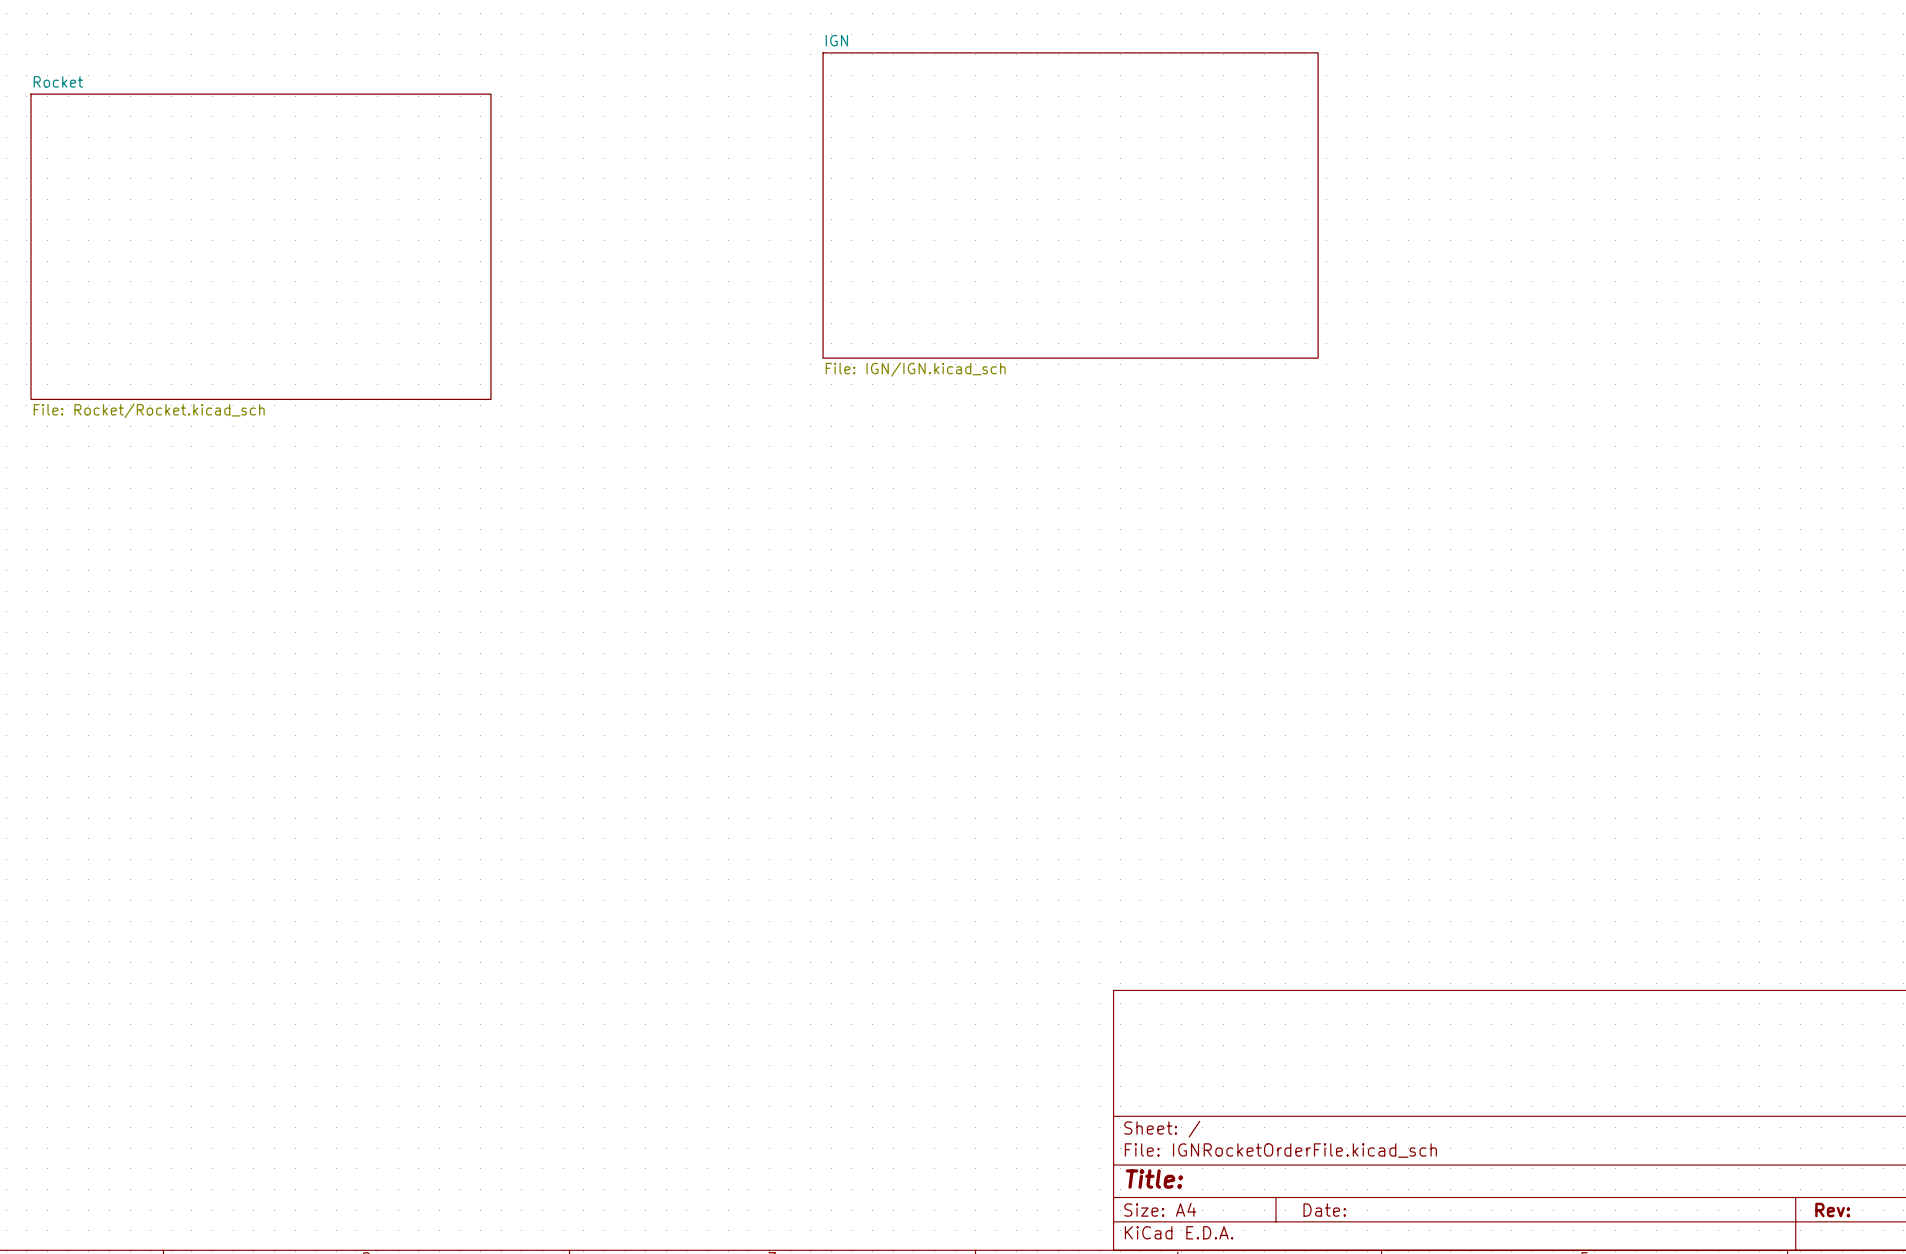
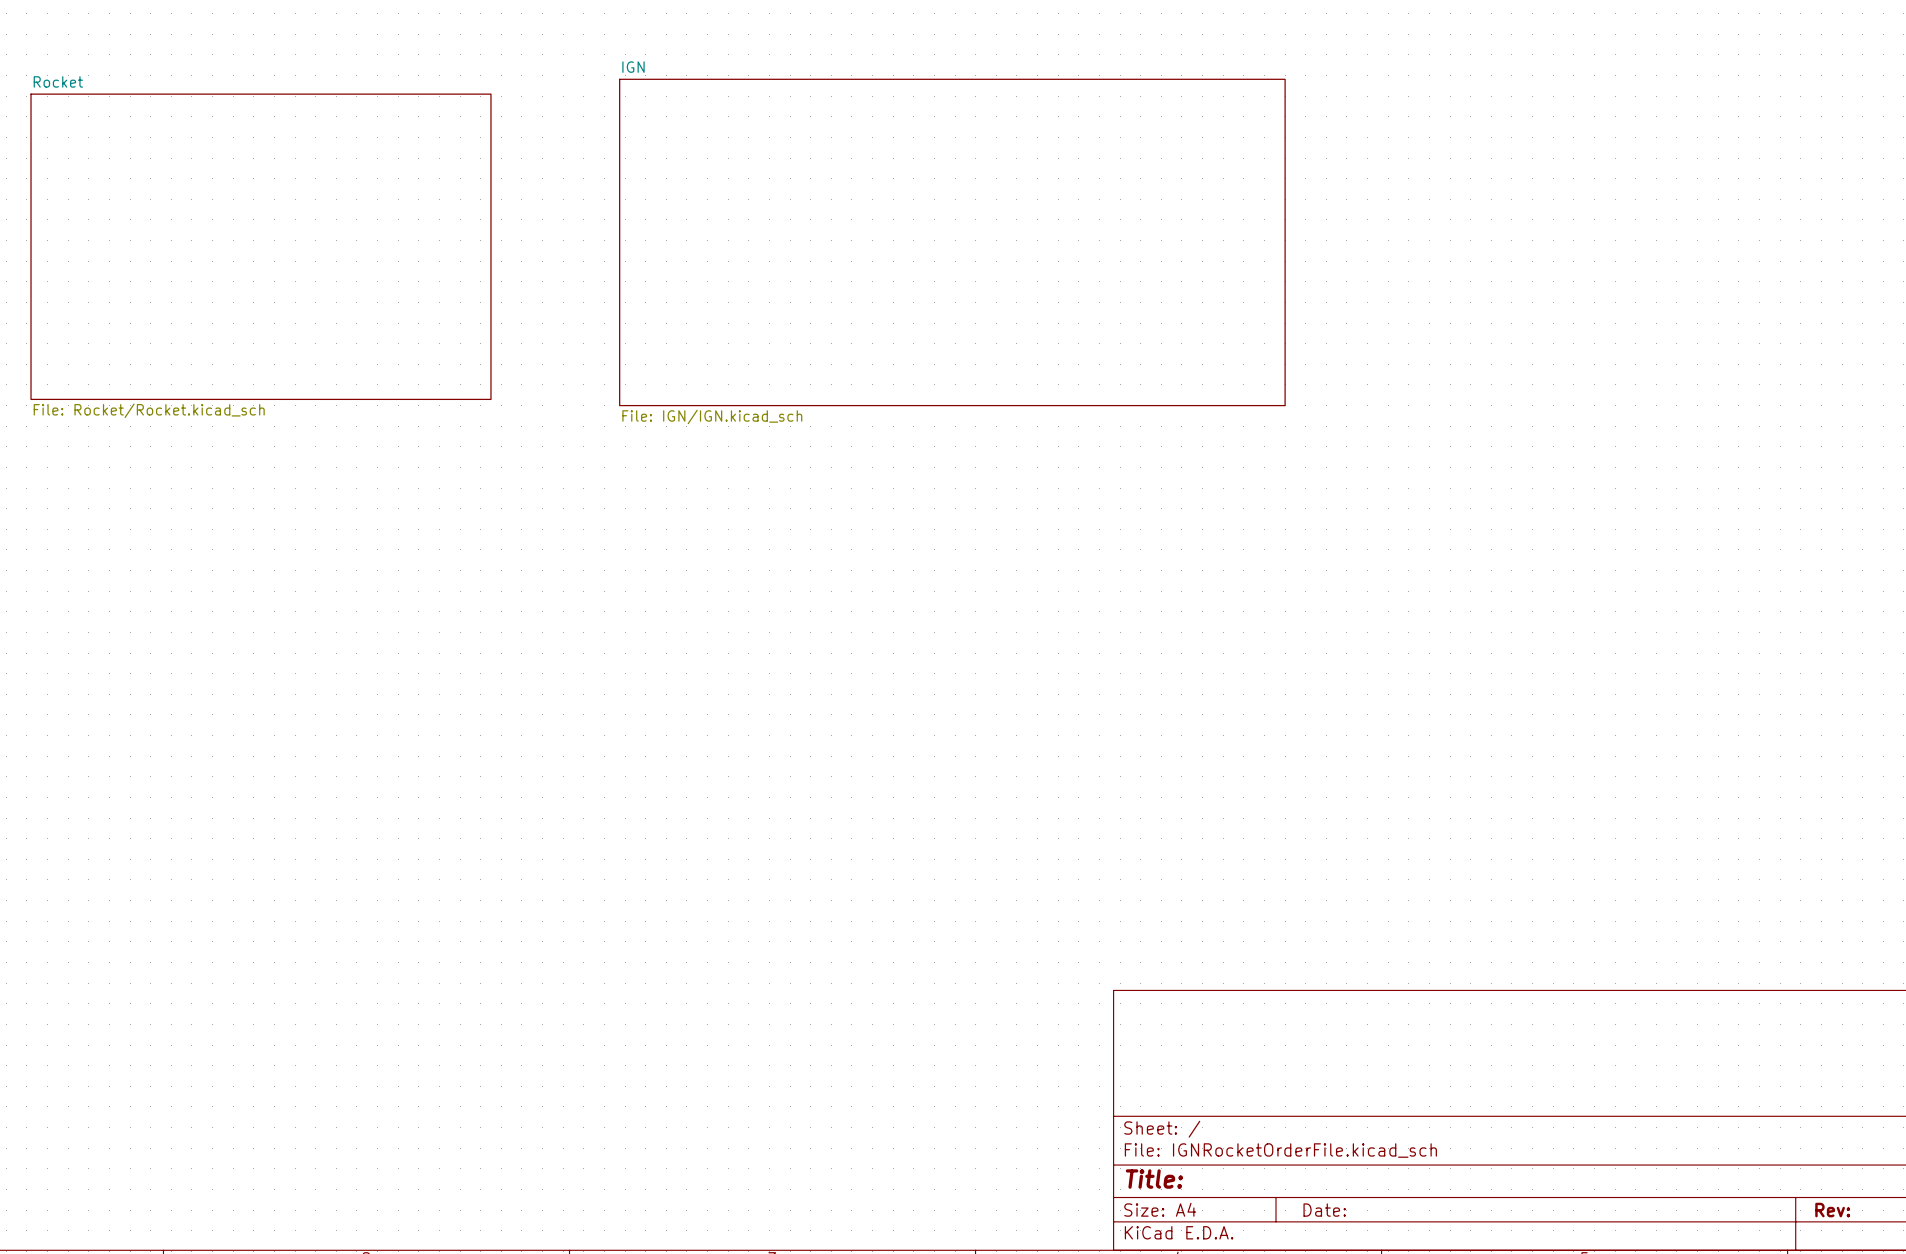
sheet IGN: File: IGN/IGN.kicad_sch (1070, 205) -> none
sheet IGN: none -> File: IGN/IGN.kicad_sch (952, 242)

